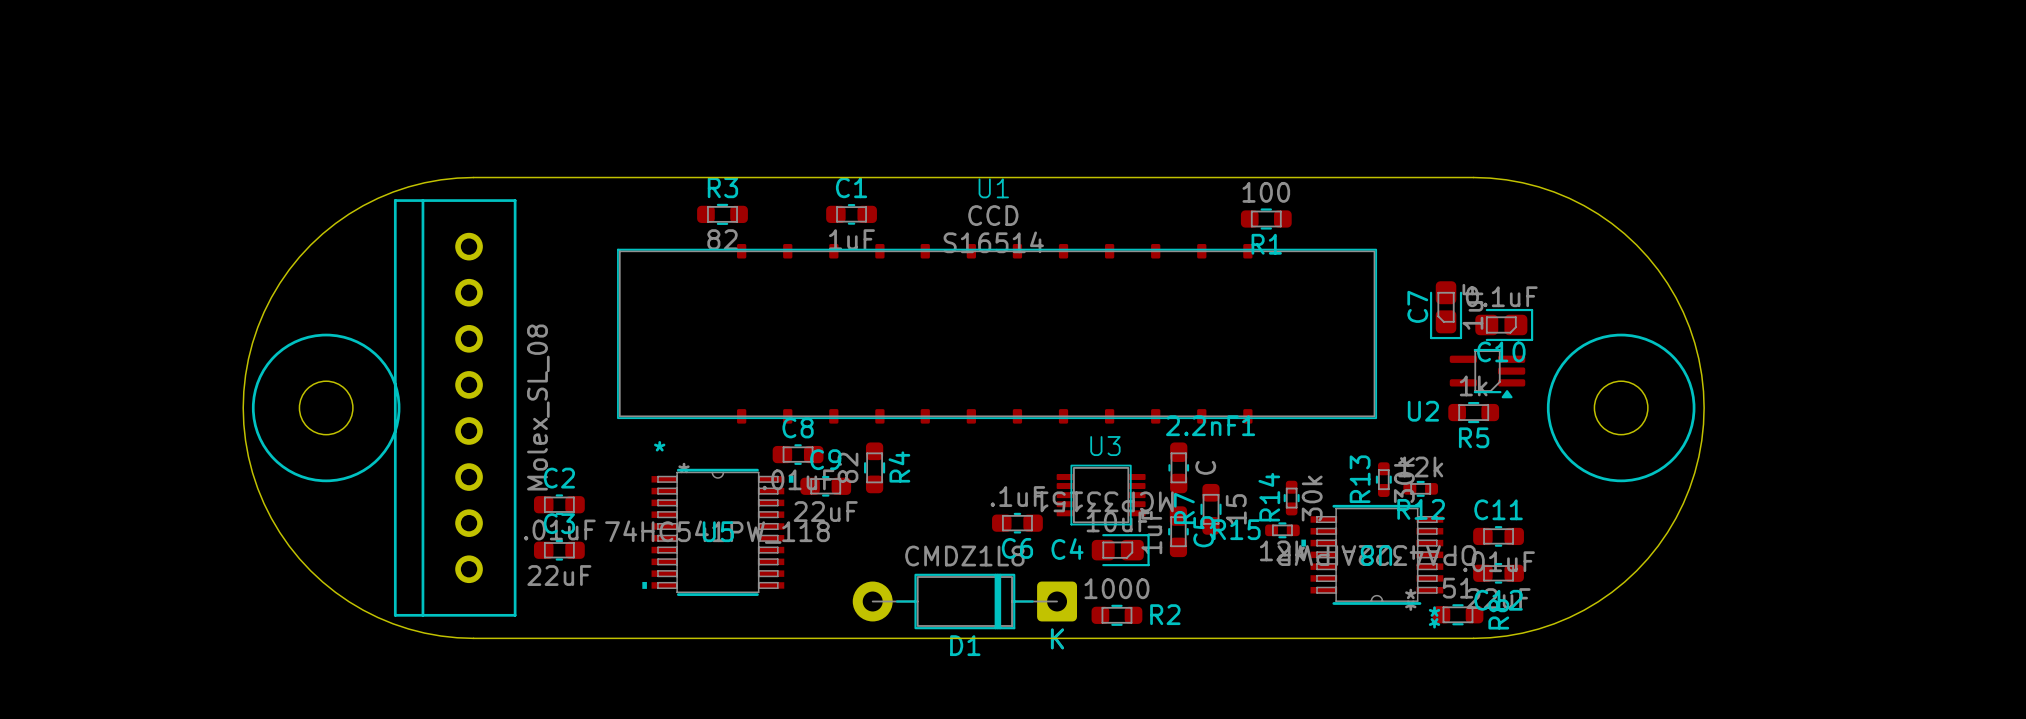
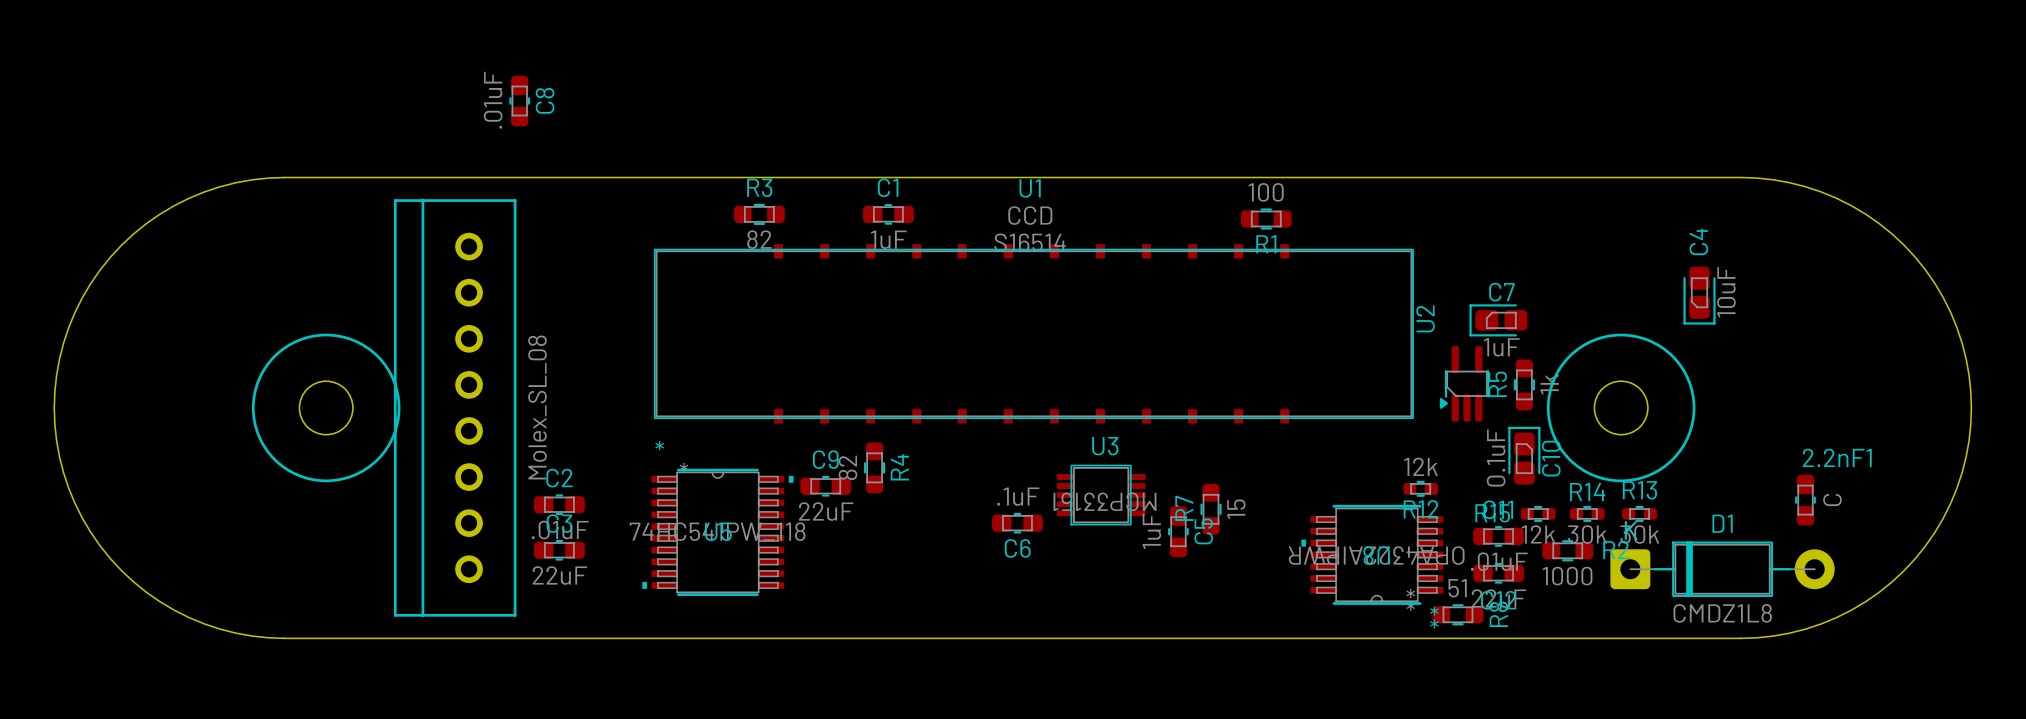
board edge: (473, 177) (424, 182) (377, 198) (349, 214) (310, 245) (289, 269) (264, 312) (248, 358) (243, 407) (248, 456) (264, 503) (289, 546) (310, 570) (335, 592) (377, 617) (424, 633) (473, 638) -> (473, 177) (268, 178) (219, 186) (174, 205) (146, 223) (121, 245) (90, 283) (75, 312) (63, 343) (56, 375) (54, 407) (56, 440) (63, 472) (75, 503) (90, 532) (110, 558) (133, 582) (174, 610) (219, 629) (268, 637) (473, 638)
board edge: (1473, 177) (1506, 179) (1554, 192) (1598, 214) (1636, 245) (1658, 269) (1683, 312) (1698, 358) (1704, 407) (1698, 456) (1683, 503) (1658, 546) (1636, 570) (1598, 601) (1554, 623) (1506, 636) (1473, 638) -> (1473, 177) (1757, 178) (1805, 186) (1836, 198) (1865, 214) (1891, 233) (1915, 257) (1934, 283) (1950, 312) (1962, 343) (1969, 375) (1971, 407) (1969, 440) (1962, 472) (1950, 503) (1934, 532) (1915, 558) (1891, 582) (1865, 601) (1836, 617) (1789, 633) (1757, 637) (1473, 638)
R3 position: (722, 214) -> (759, 214)
C1 position: (851, 214) -> (888, 214)
C7 rotation: 0° (1446, 310) -> 90° clockwise (1498, 320)
C7 position: (1446, 310) -> (1498, 320)
C10 rotation: 0° (1504, 324) -> 90° counterclockwise (1524, 455)
C10 position: (1504, 324) -> (1524, 455)
U1 position: (997, 333) -> (1033, 333)
U2 rotation: 0° (1487, 373) -> 90° clockwise (1464, 383)
R5 rotation: 0° (1473, 412) -> 90° clockwise (1524, 384)
R5 position: (1473, 412) -> (1524, 384)
C8 rotation: 0° (798, 454) -> 90° clockwise (519, 100)
C8 position: (798, 454) -> (519, 100)
2.2nF1 position: (1178, 467) -> (1805, 500)
R13 rotation: 0° (1383, 479) -> 90° clockwise (1639, 513)
R13 position: (1383, 479) -> (1639, 513)
R14 rotation: 0° (1291, 498) -> 90° clockwise (1587, 513)
R14 position: (1291, 498) -> (1587, 513)
R15 position: (1282, 530) -> (1538, 513)
C4 rotation: 0° (1120, 550) -> 90° clockwise (1699, 295)
C4 position: (1120, 550) -> (1699, 295)
R2 value position: 1000 (1116, 588) -> 1000 (1567, 576)
D1 rotation: 0° (964, 601) -> 180° (1722, 569)
D1 position: (964, 601) -> (1722, 569)
R2 position: (1116, 615) -> (1567, 550)

